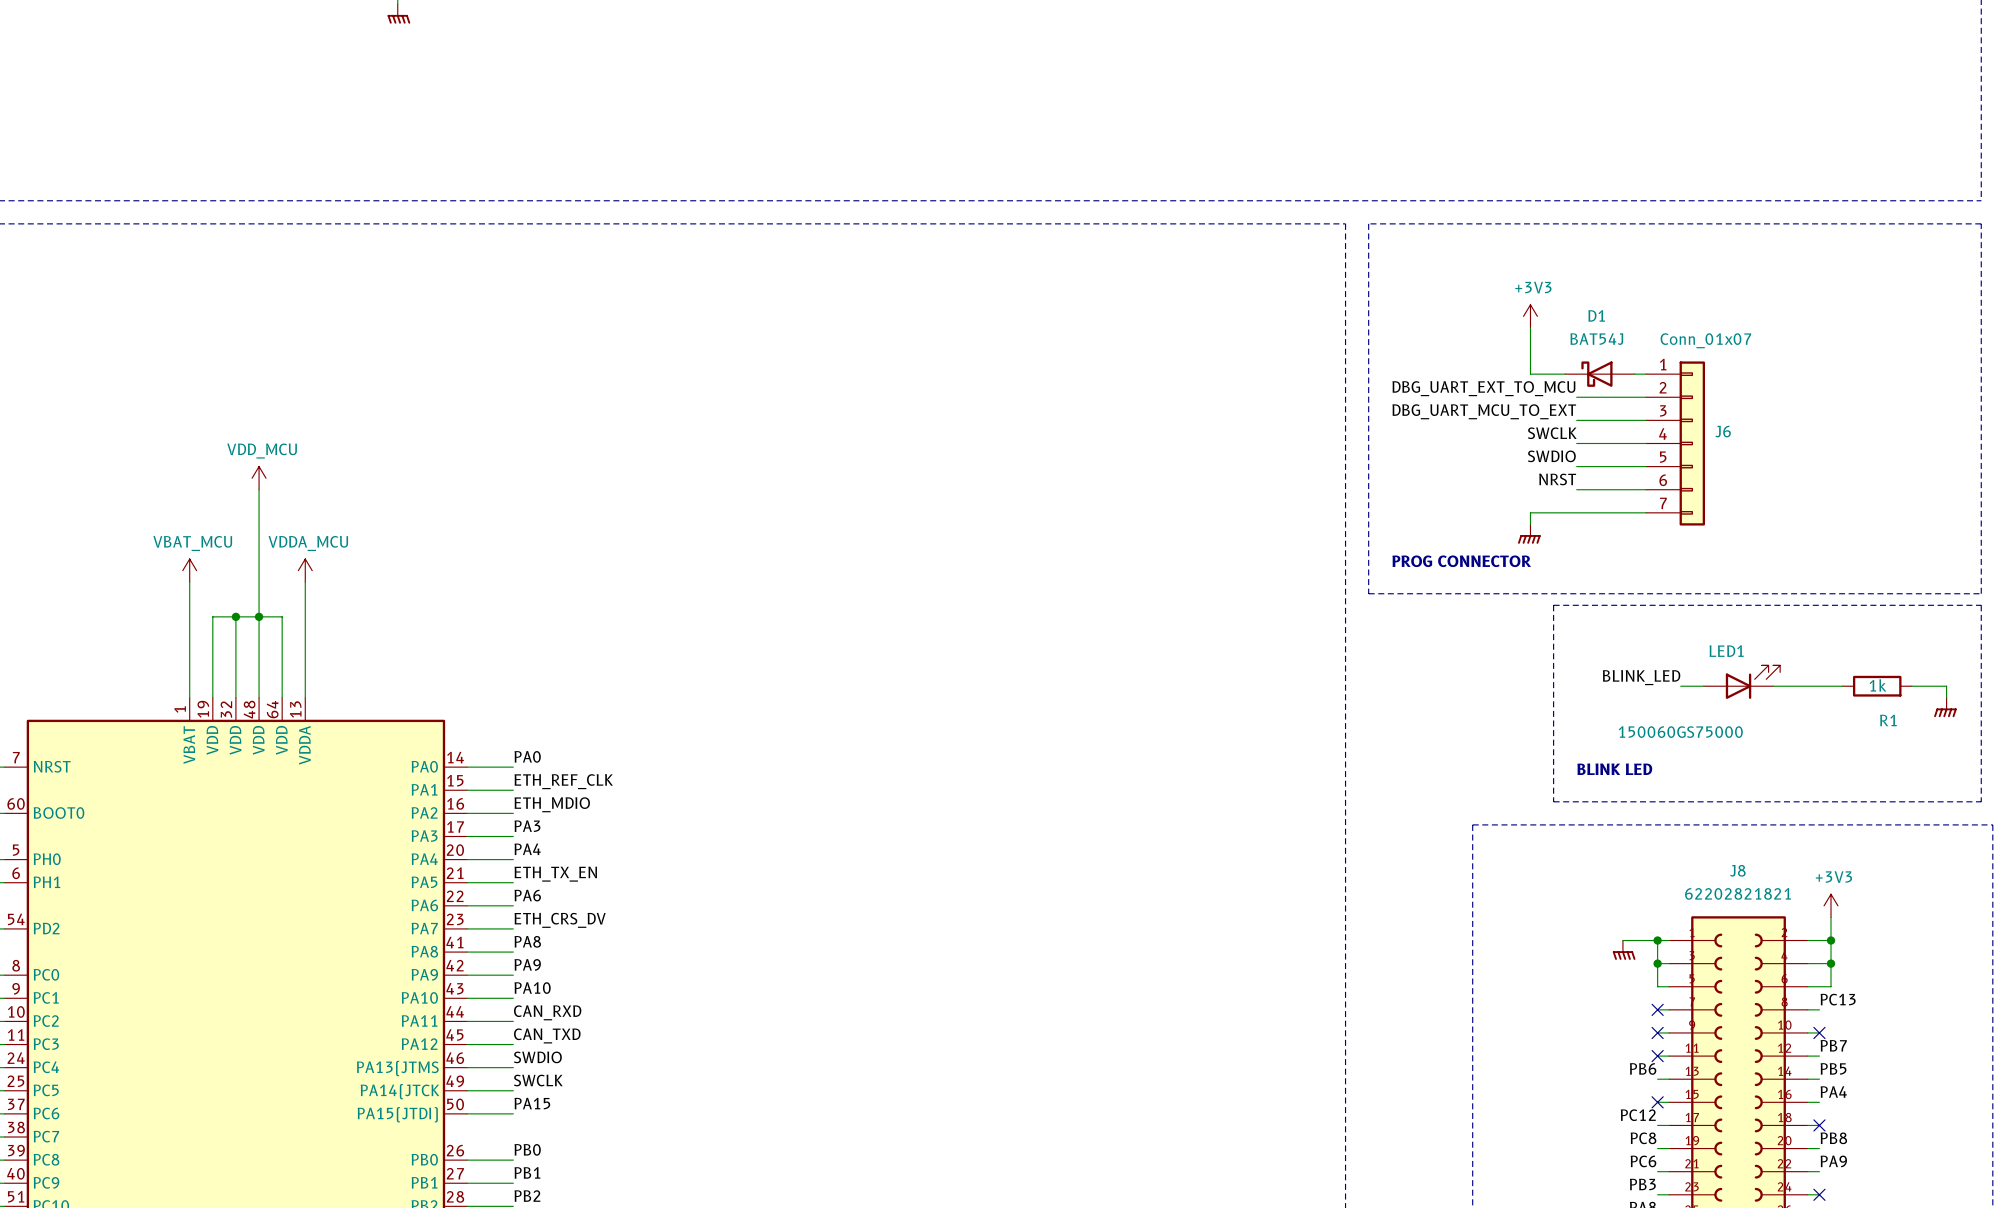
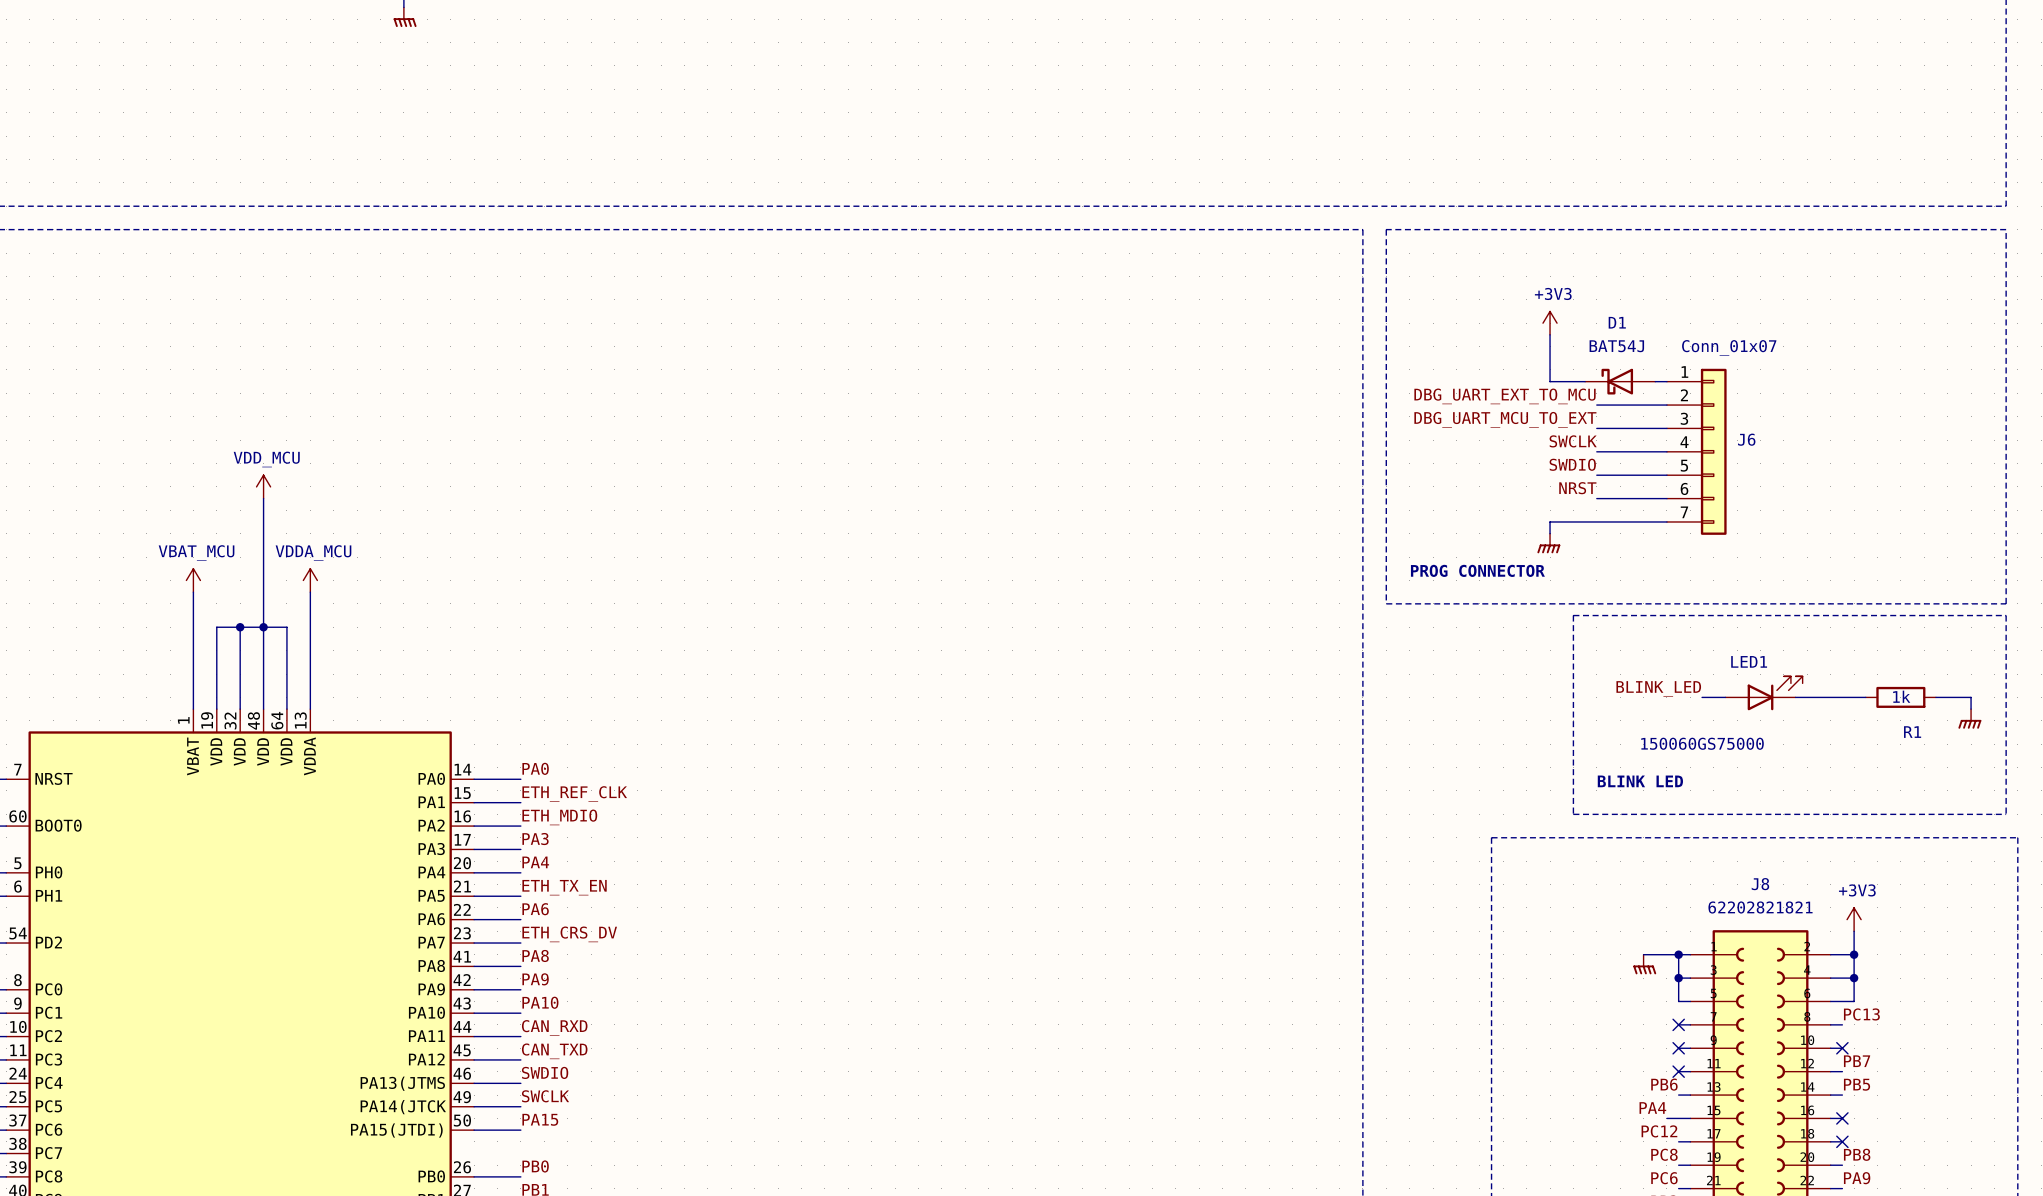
label position: PA4 (1833, 1092) -> PA4 (1652, 1108)
wire: none -> (1666, 1118) (1678, 1118)
no-connect mark: (1657, 1102) -> none
no-connect mark: none -> (1842, 1118)

